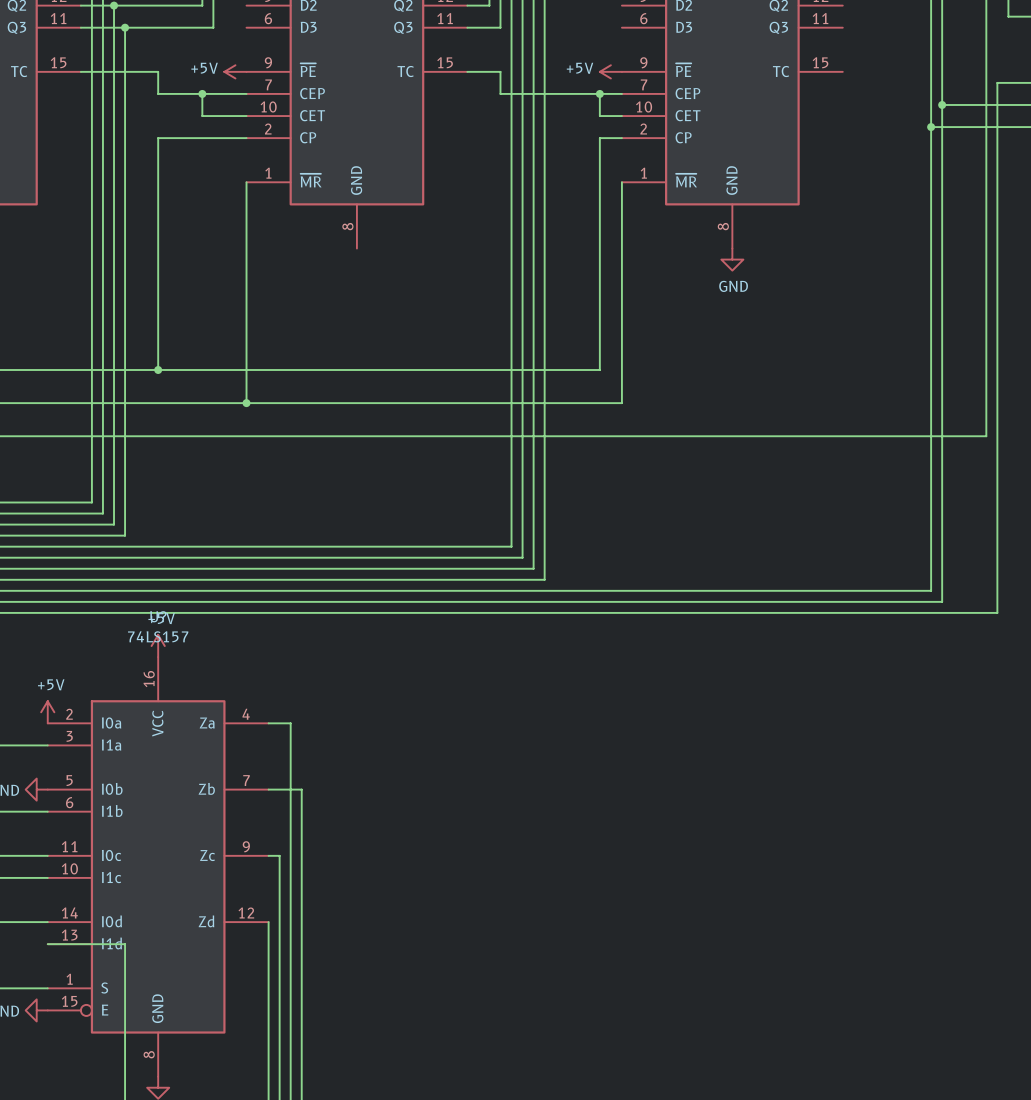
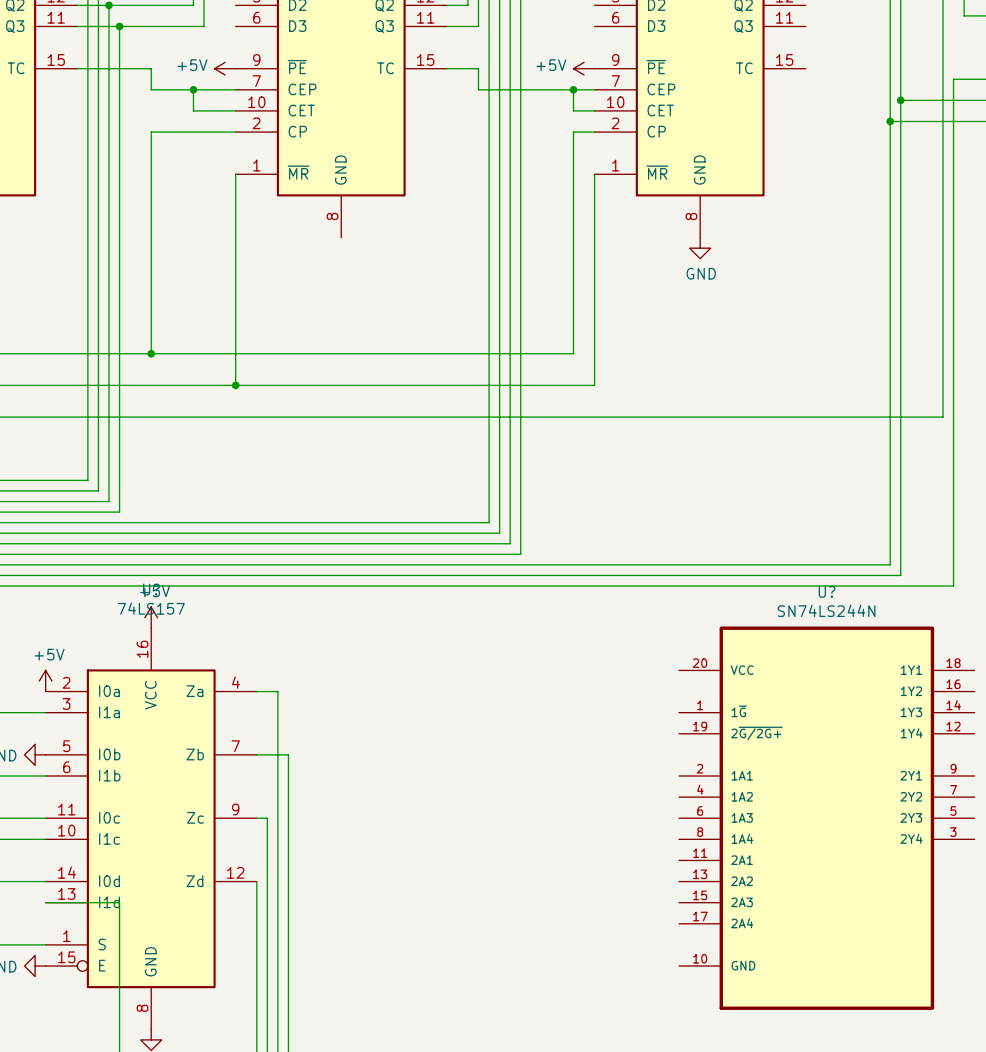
U?: none -> SN74LS244N (826, 818)

